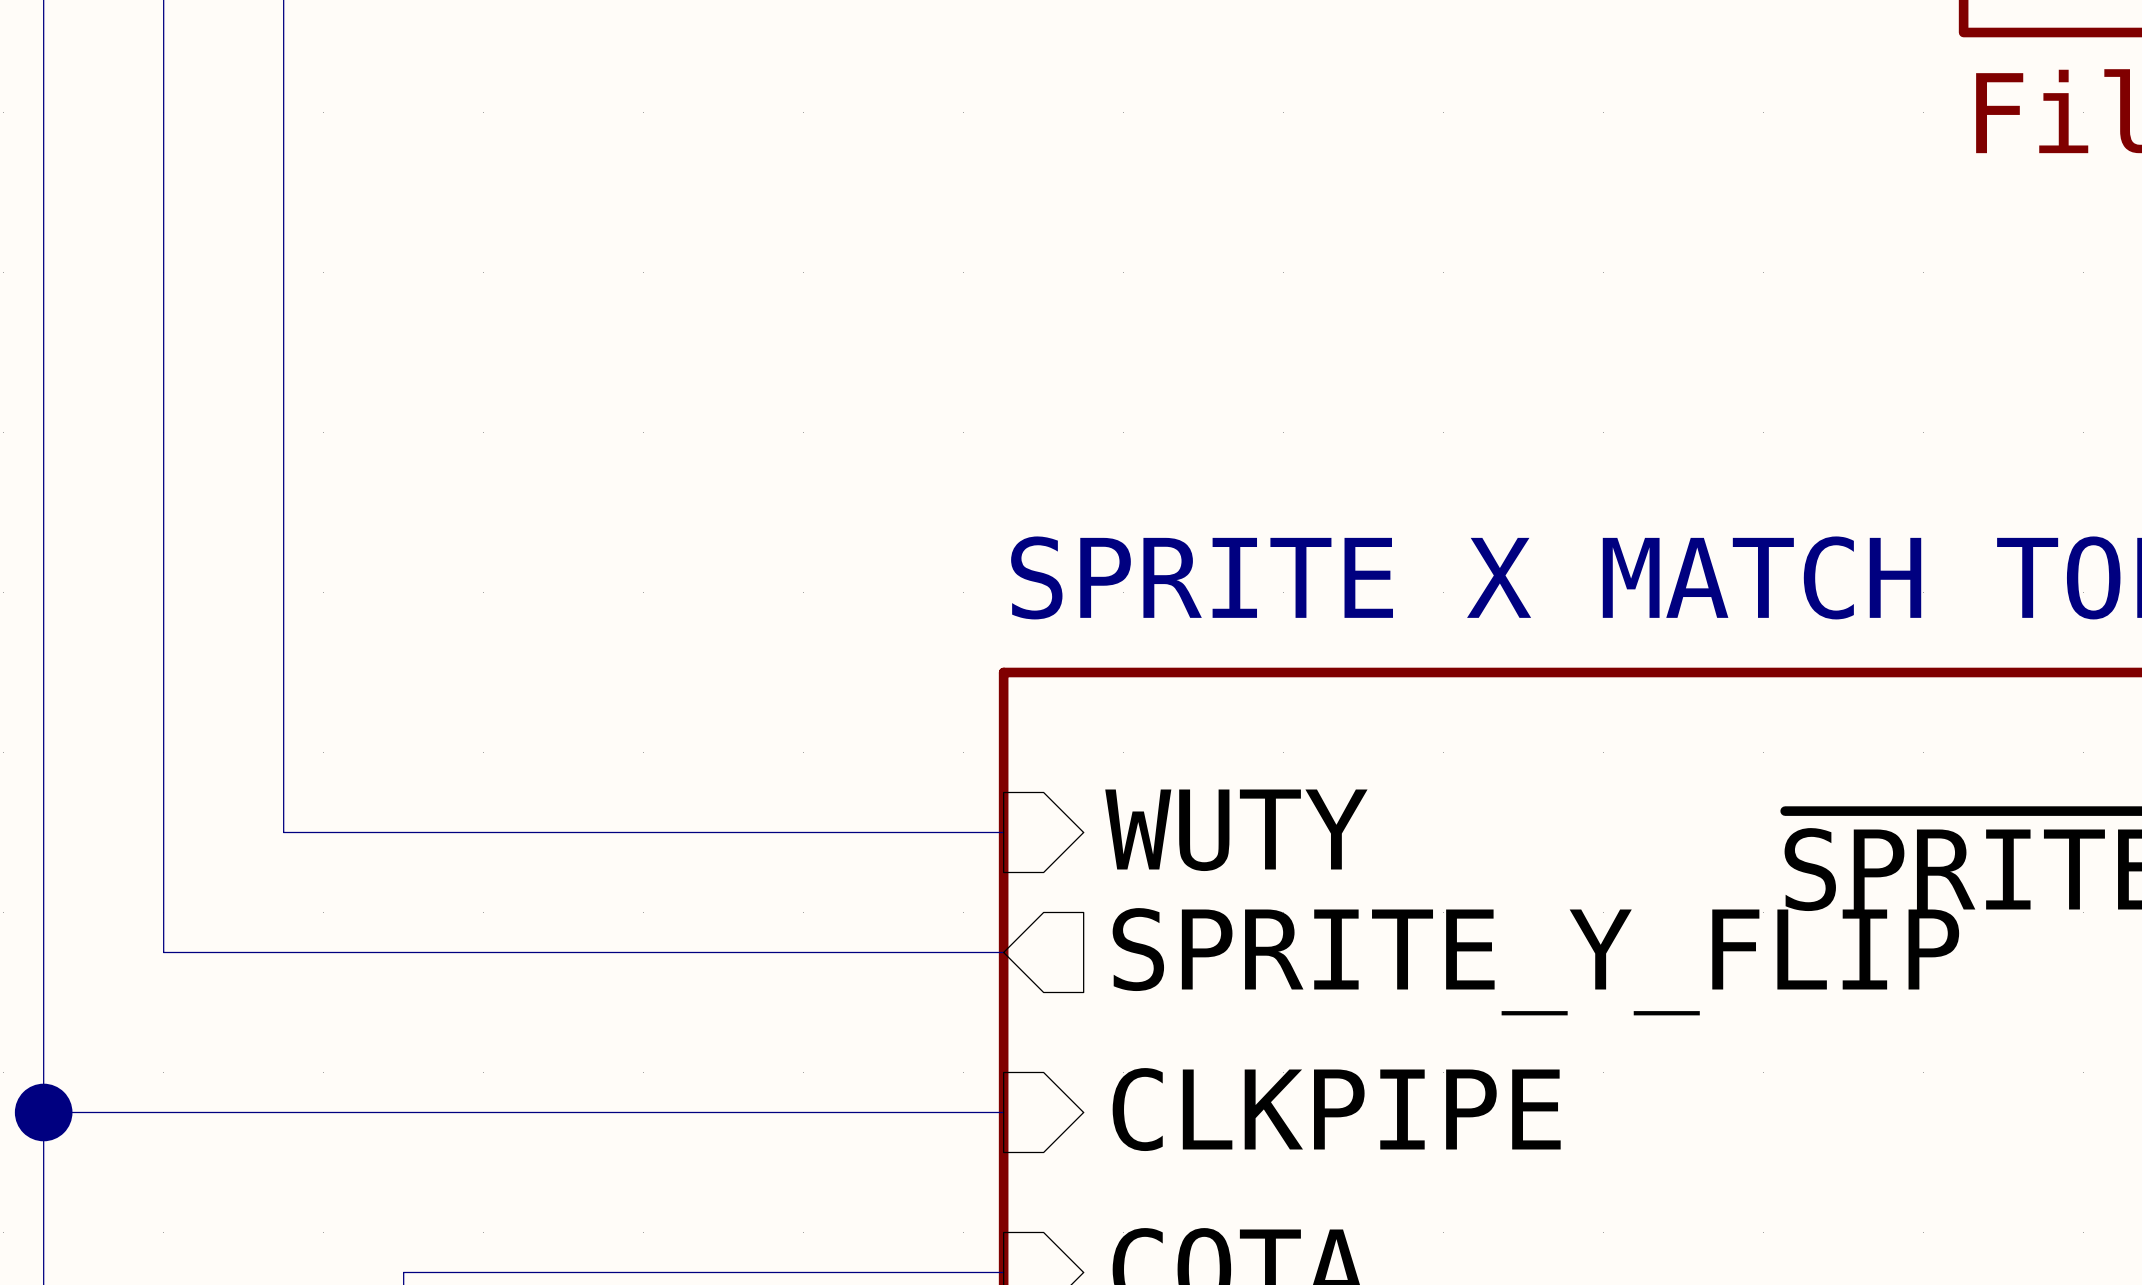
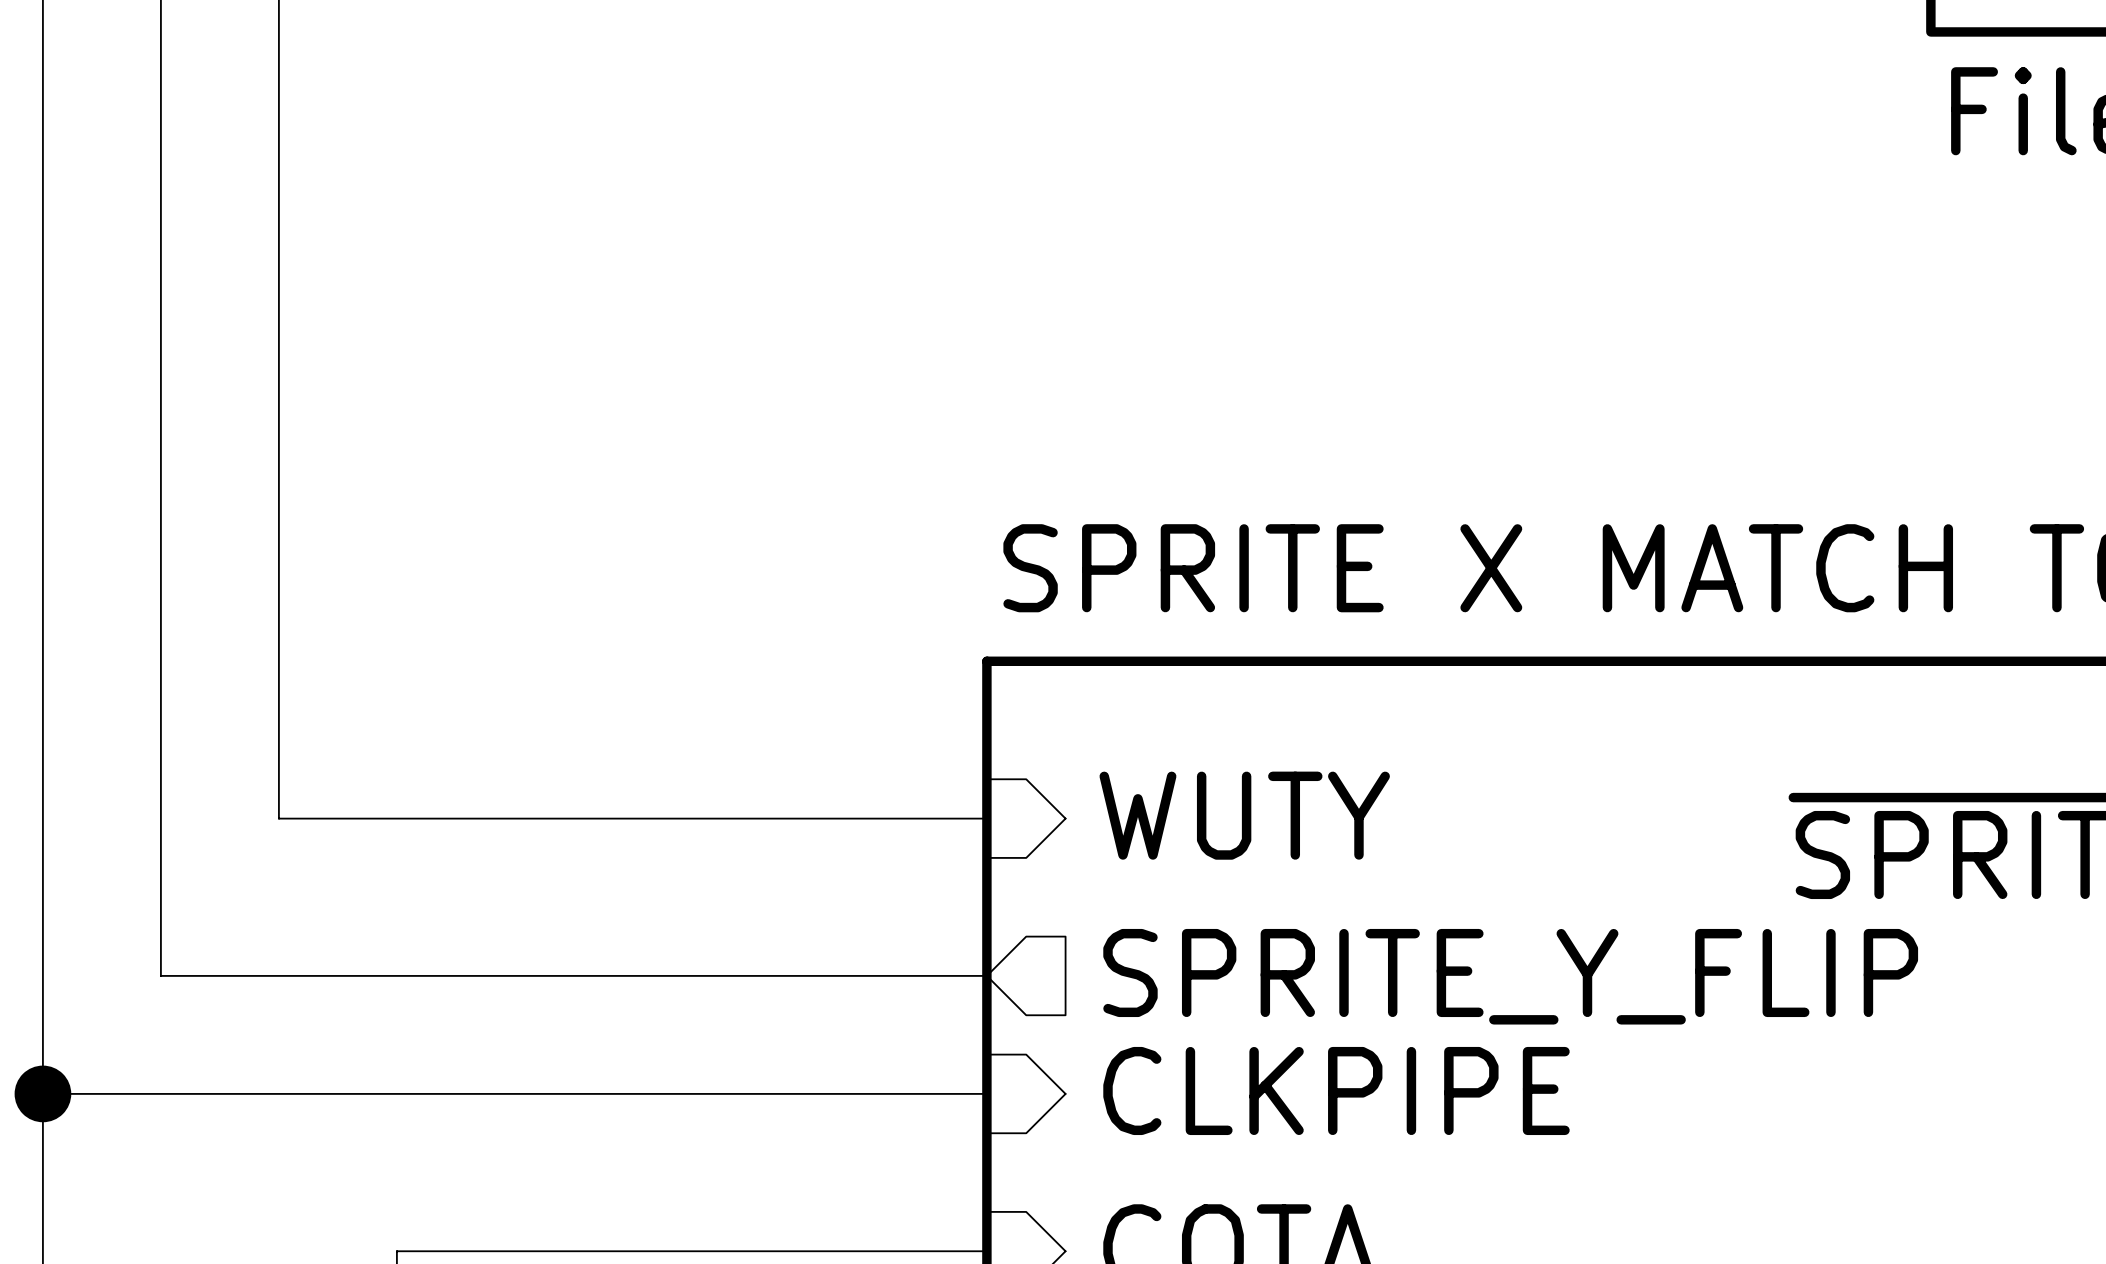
wire: (163, 952) (1003, 952) -> (160, 936) (160, 975) (986, 975)
sheet pin position: SPRITE_Y_FLIP (1535, 961) -> SPRITE_Y_FLIP (1510, 976)

